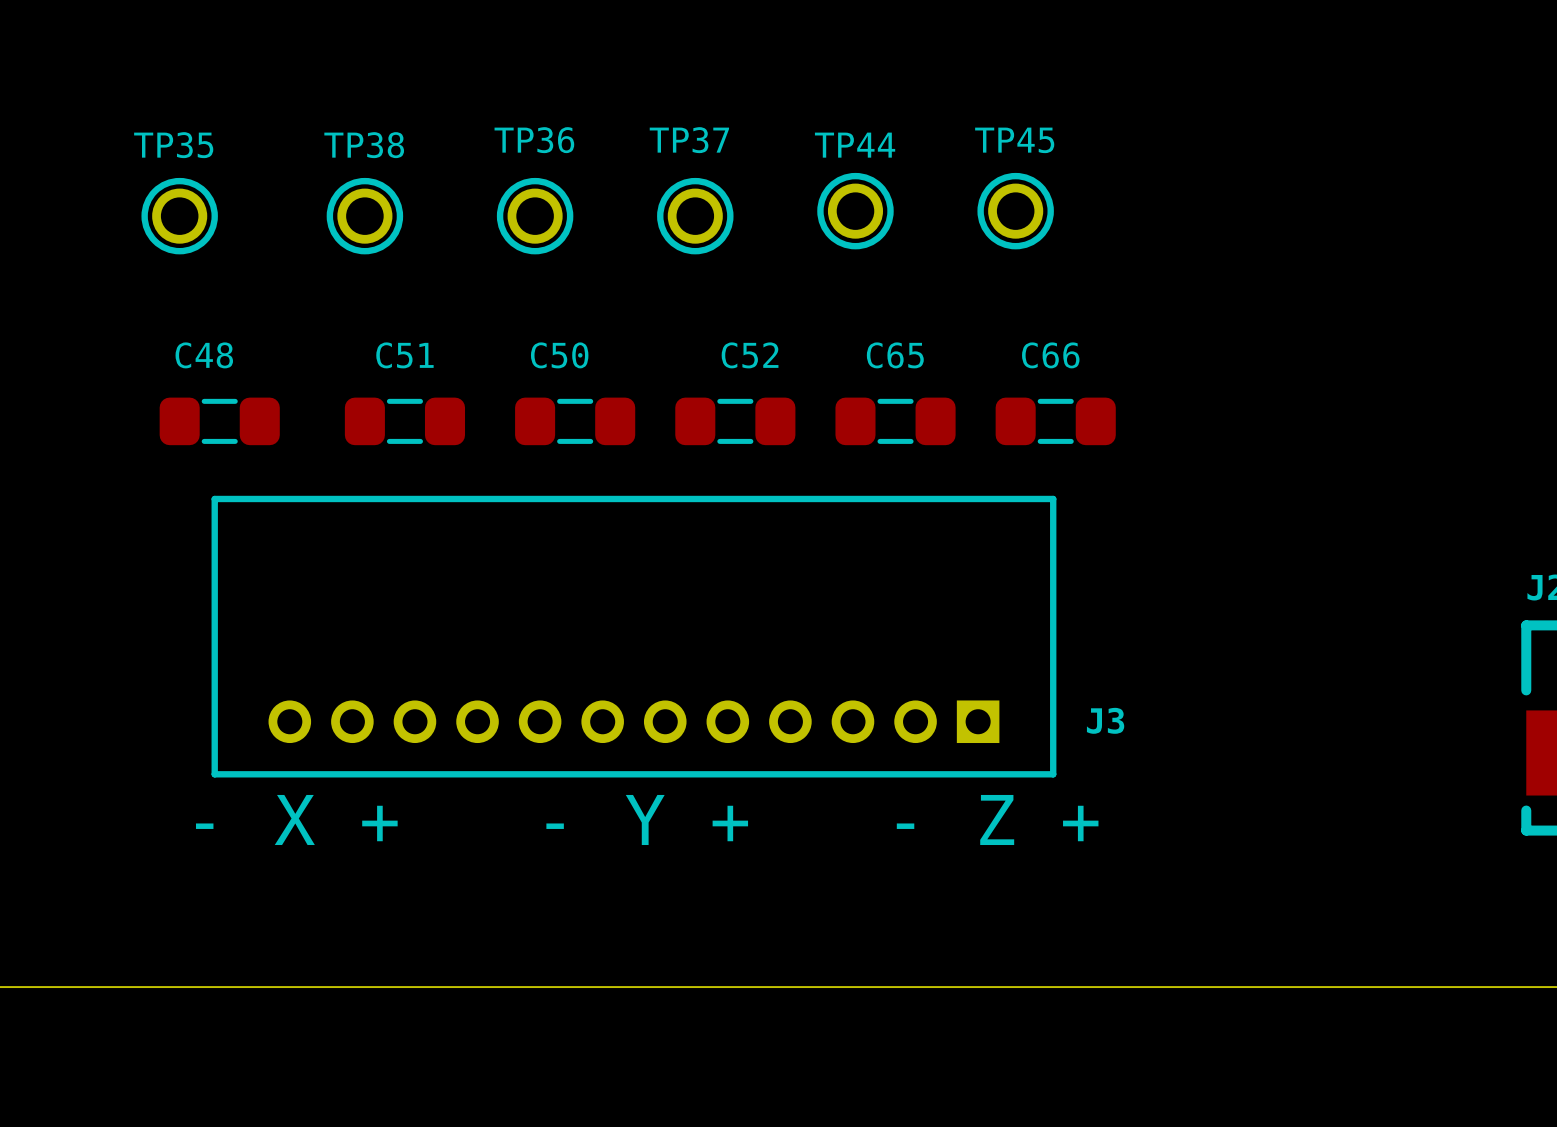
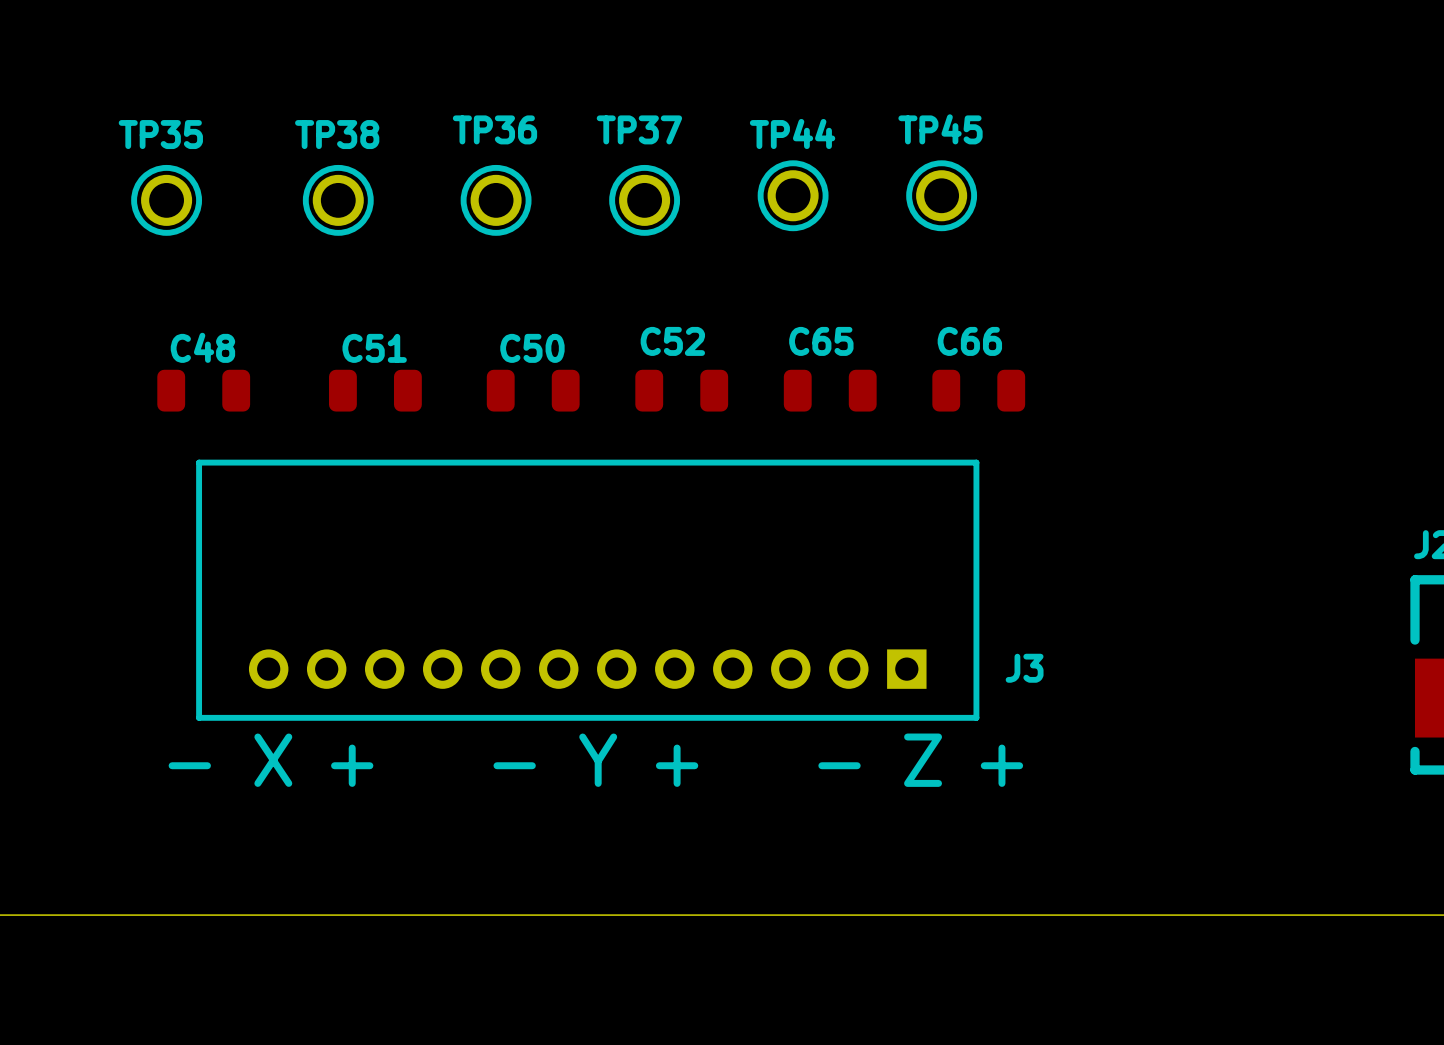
C48 footprint: [159, 397, 280, 446] -> [157, 369, 251, 412]
C51 footprint: [344, 397, 466, 446] -> [329, 369, 422, 412]
C50 footprint: [515, 397, 636, 446] -> [486, 369, 580, 412]
C52 footprint: [675, 397, 796, 446] -> [635, 369, 729, 412]
C65 footprint: [835, 397, 956, 446] -> [783, 369, 877, 412]
C66 footprint: [995, 397, 1116, 446] -> [932, 369, 1026, 412]

